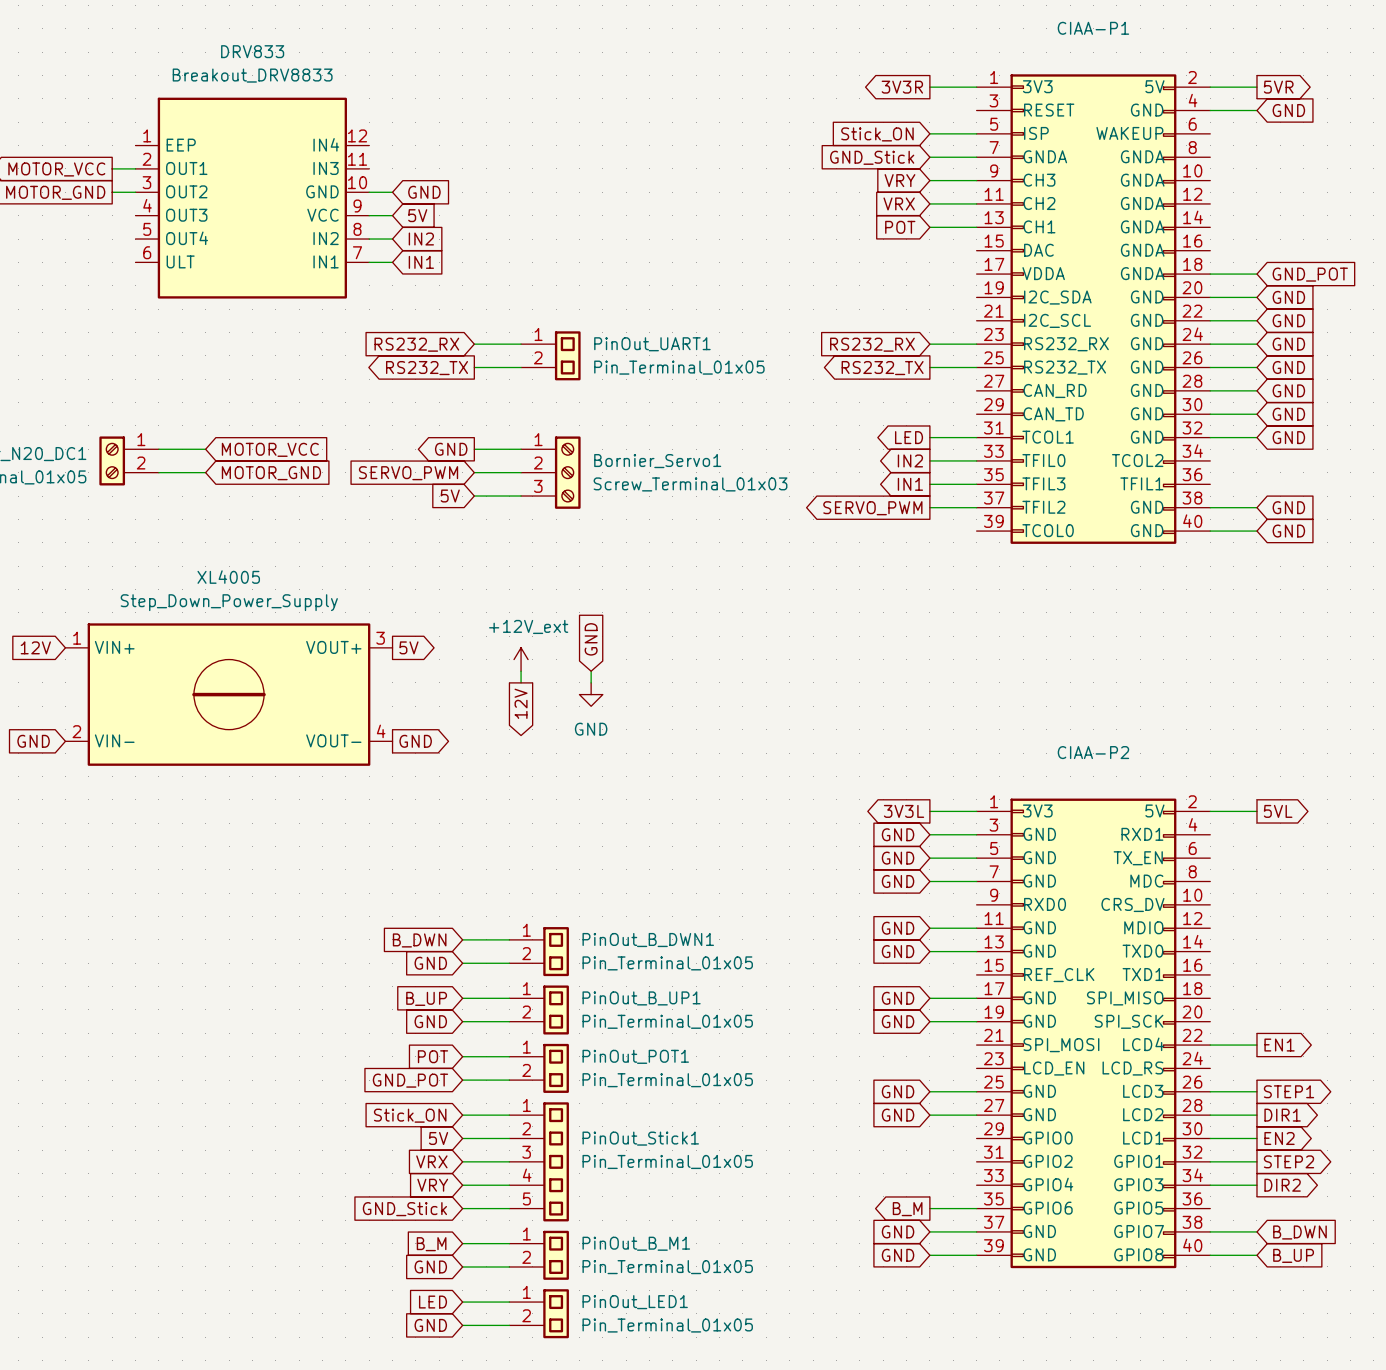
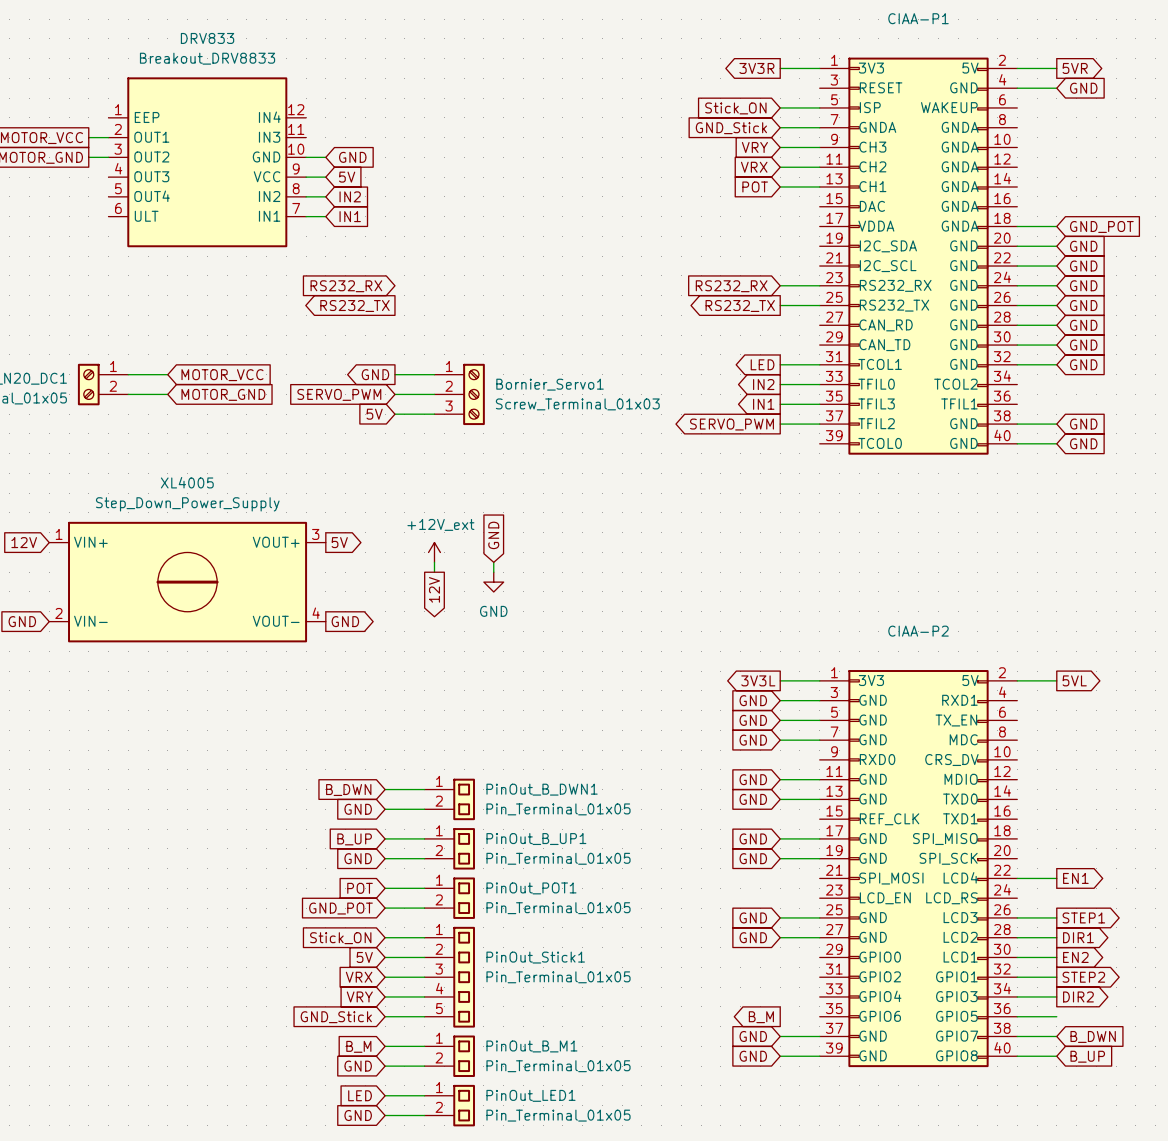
wire: (474, 344) (521, 344) -> none
PinOut_UART1: Pin_Terminal_01x05 (550, 355) -> none
wire: (474, 367) (521, 367) -> none
wire: (929, 1208) (976, 1208) -> none
wire: none -> (1017, 1016) (1056, 1016)

